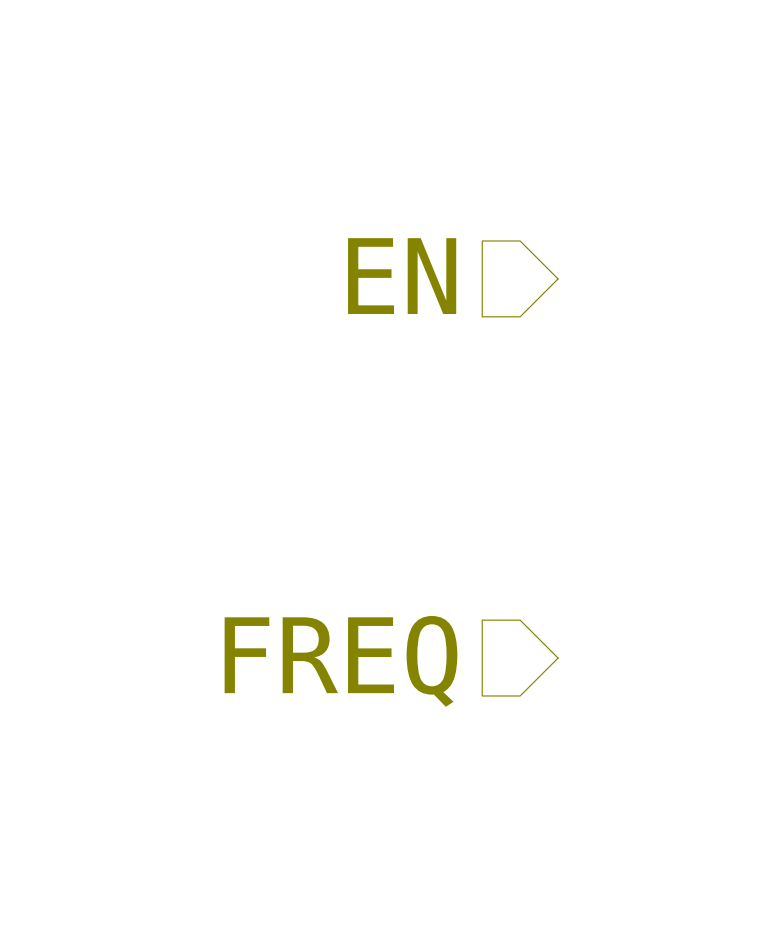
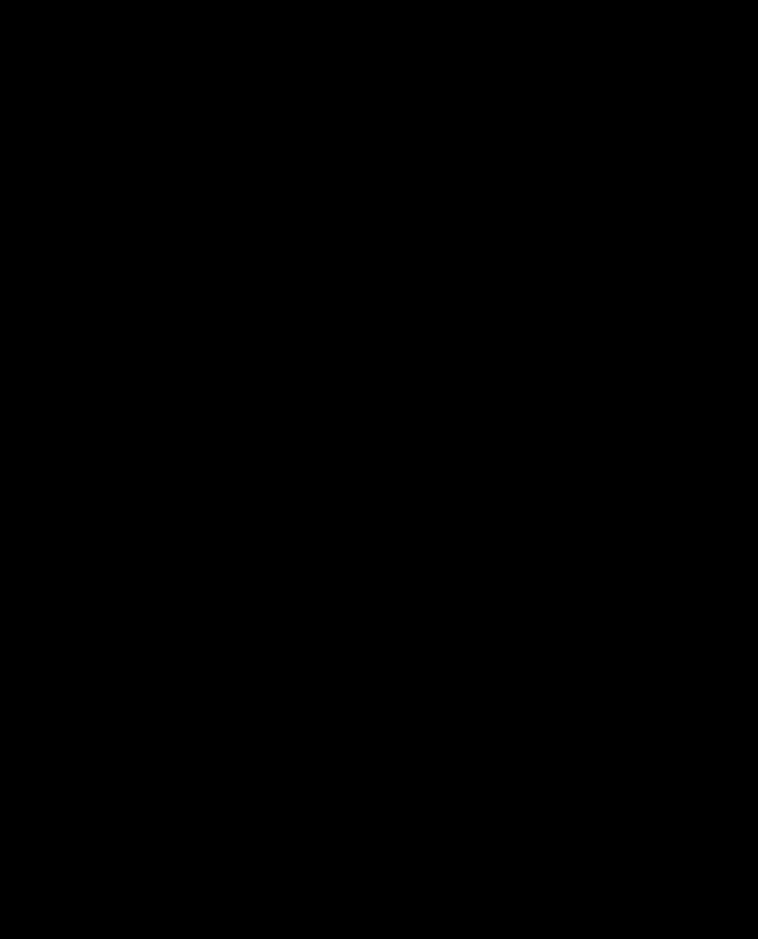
hierarchical label: EN (402, 276) -> none
hierarchical label: FREQ (340, 661) -> none

